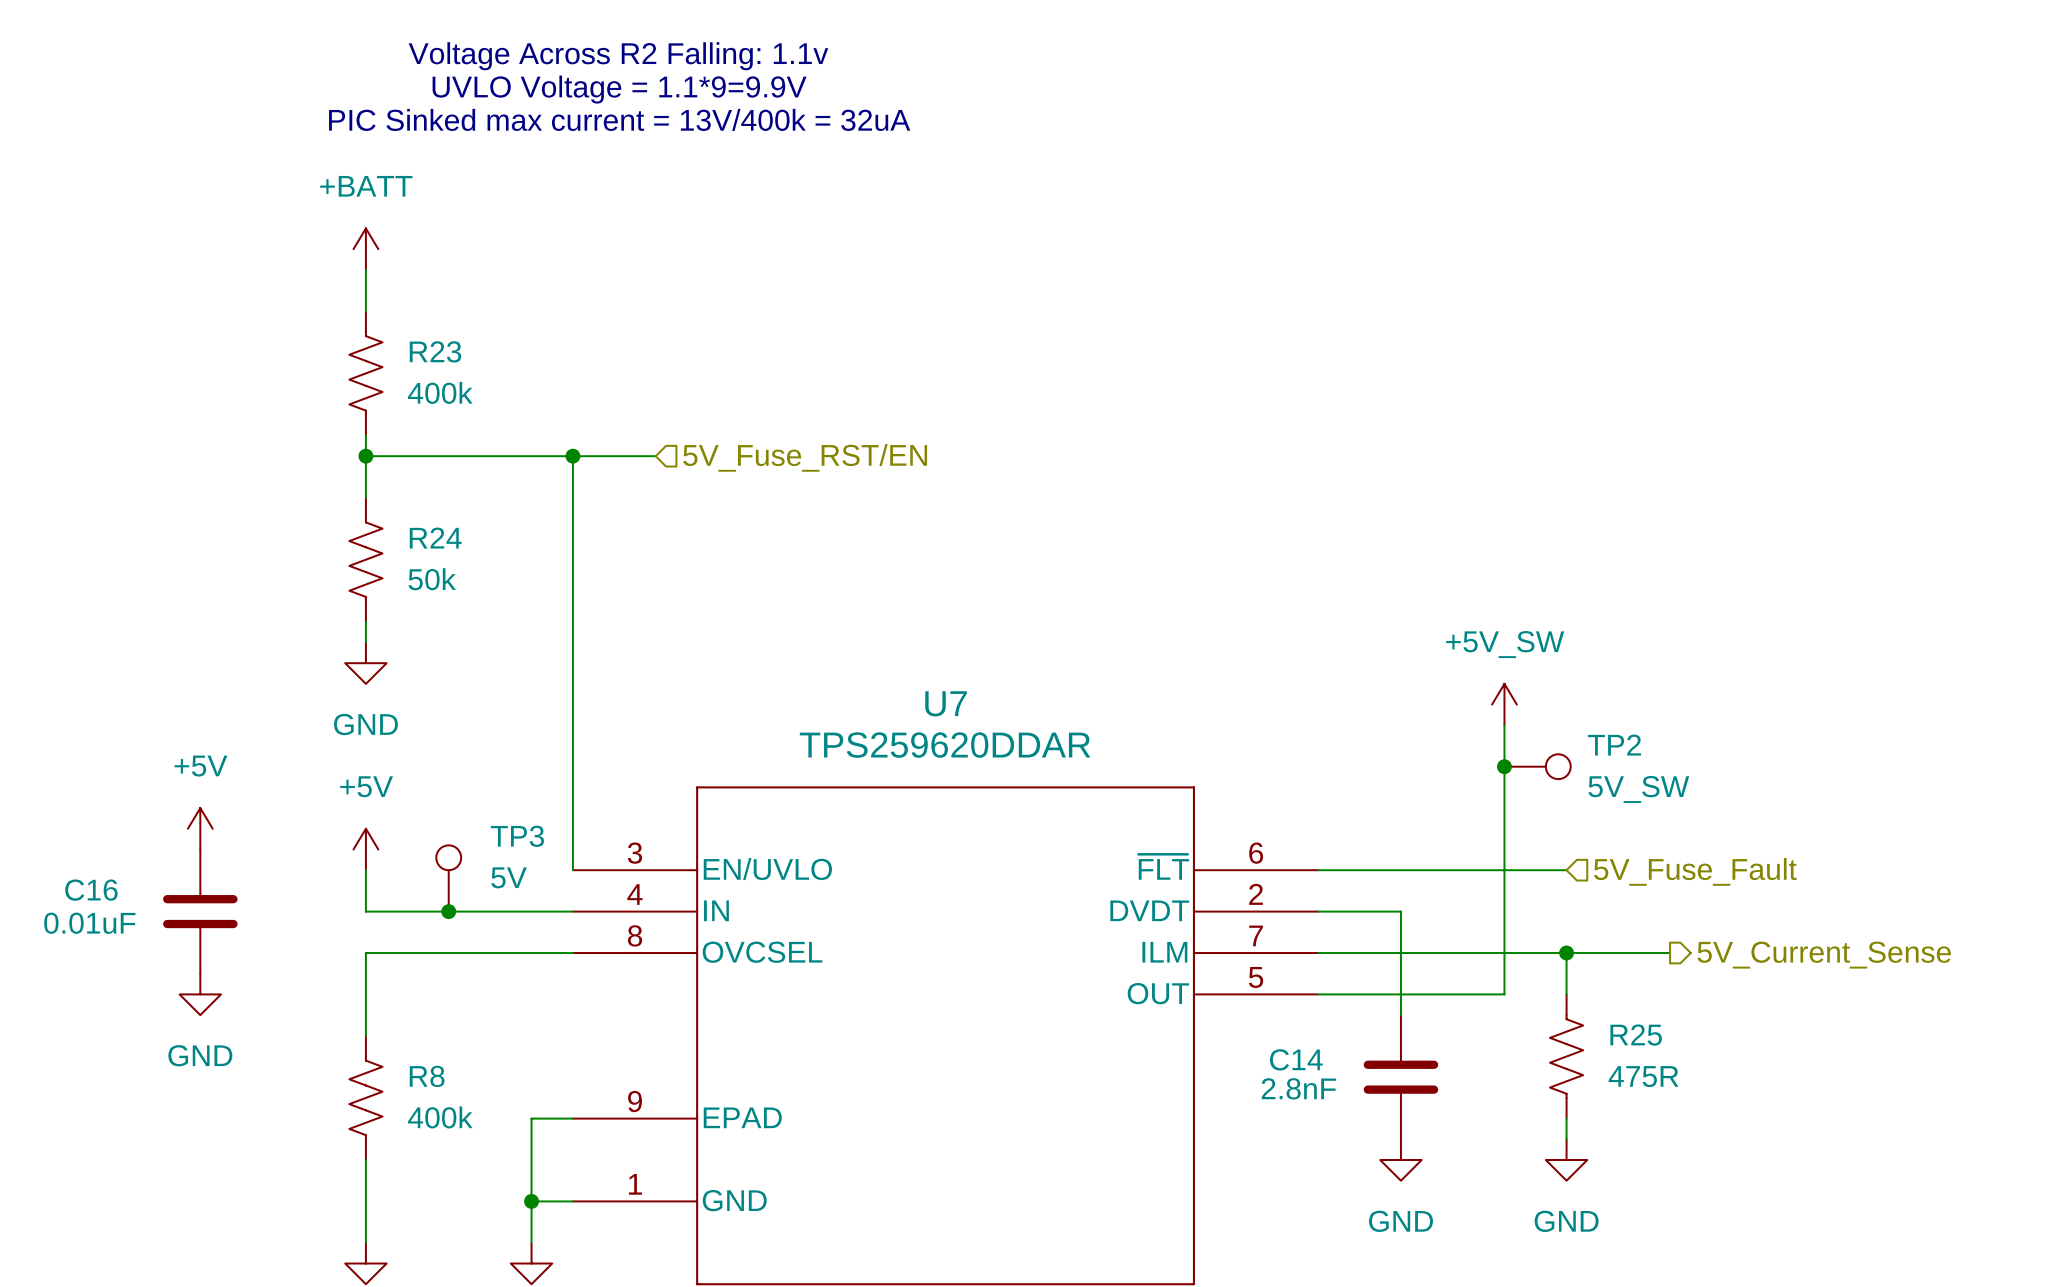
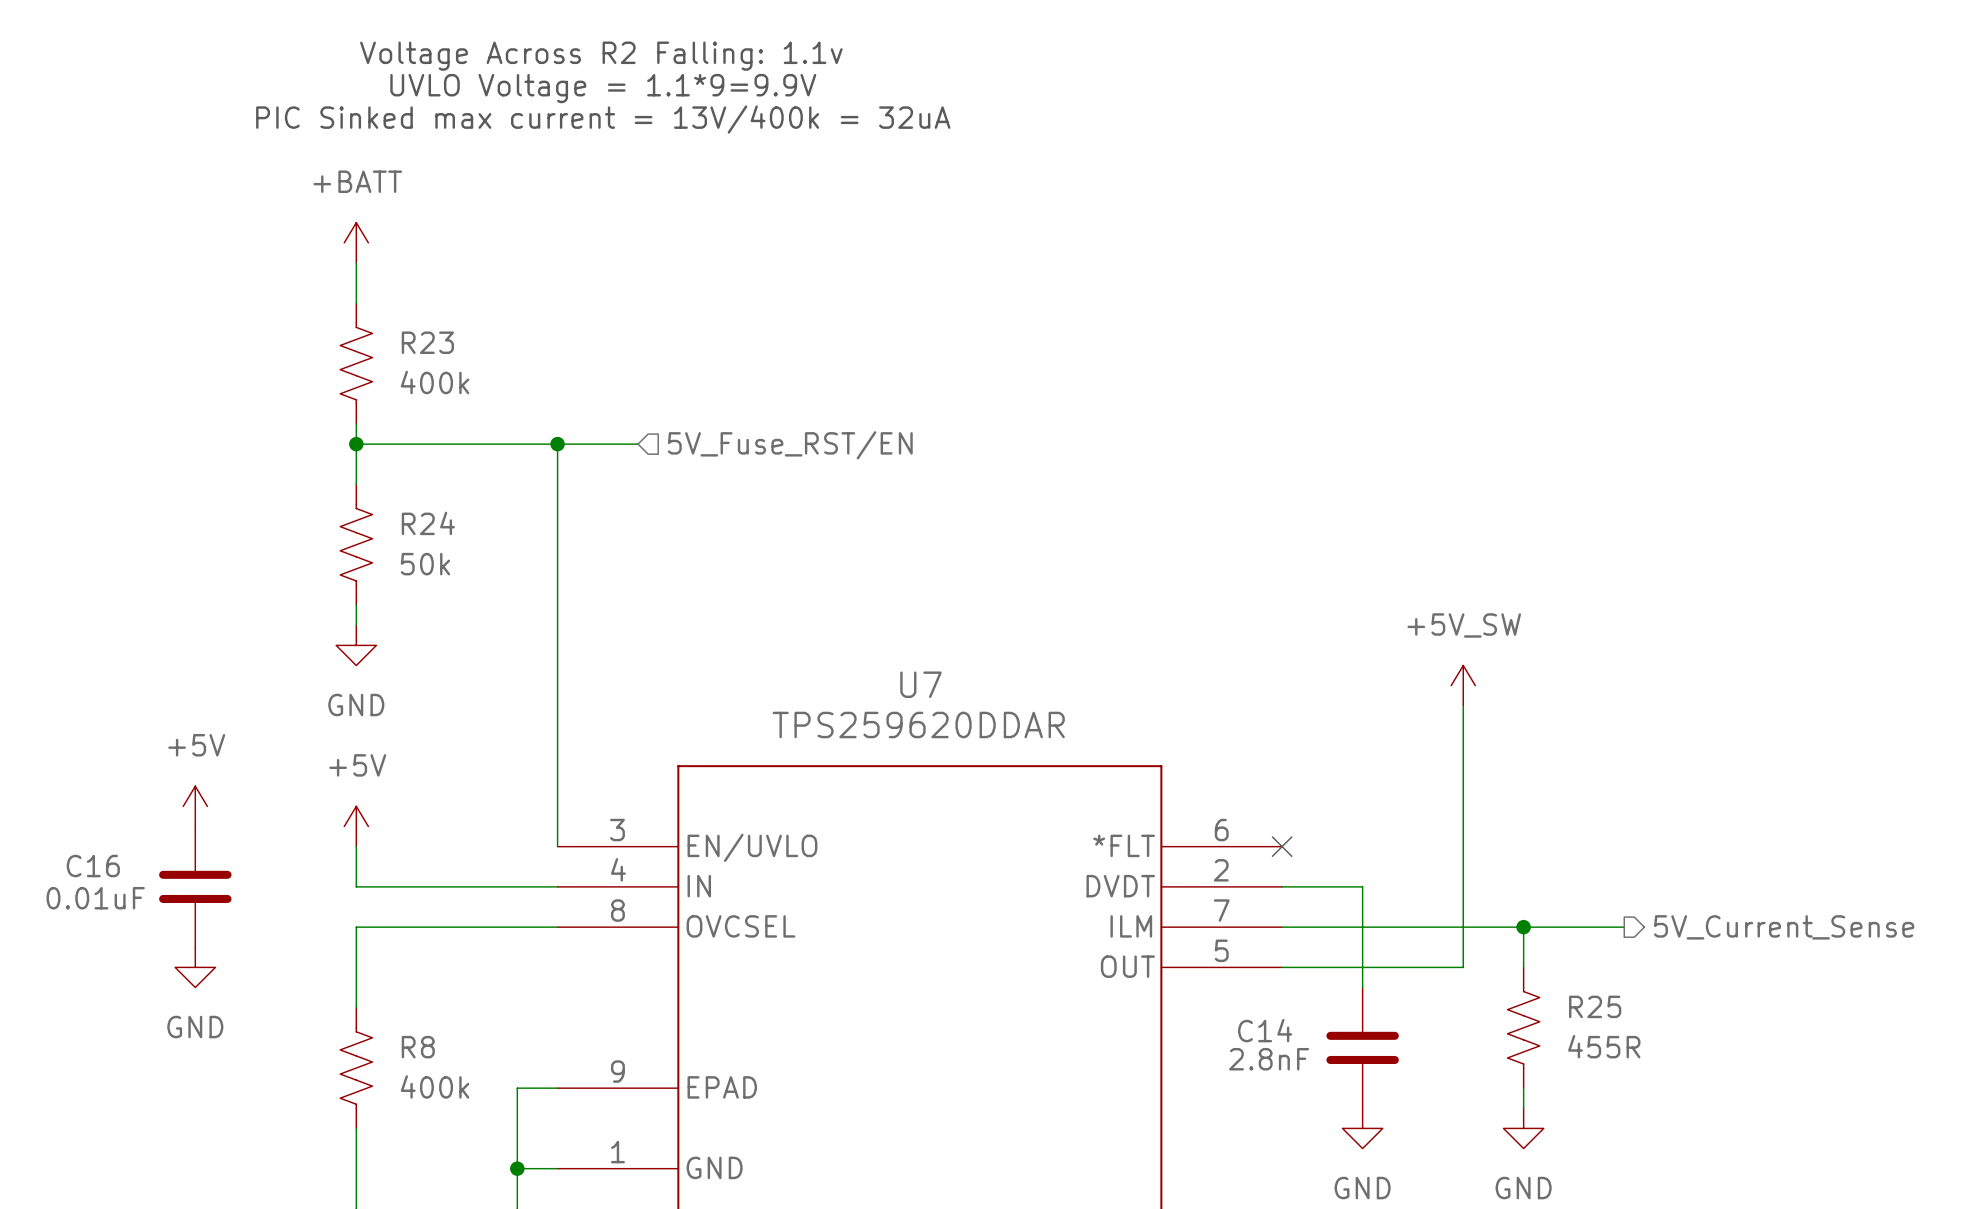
junction: (1504, 766) -> none
TP2: 5V_SW (1537, 766) -> none
U7 pin name: ~{FLT} (1163, 867) -> *FLT (1124, 845)
wire: (1318, 870) (1566, 870) -> none
no-connect mark: none -> (1282, 846)
hierarchical label: 5V_Fuse_Fault (1695, 871) -> none
TP3: 5V (448, 878) -> none
junction: (448, 911) -> none
R25 value: 475R (1643, 1076) -> 455R (1604, 1046)

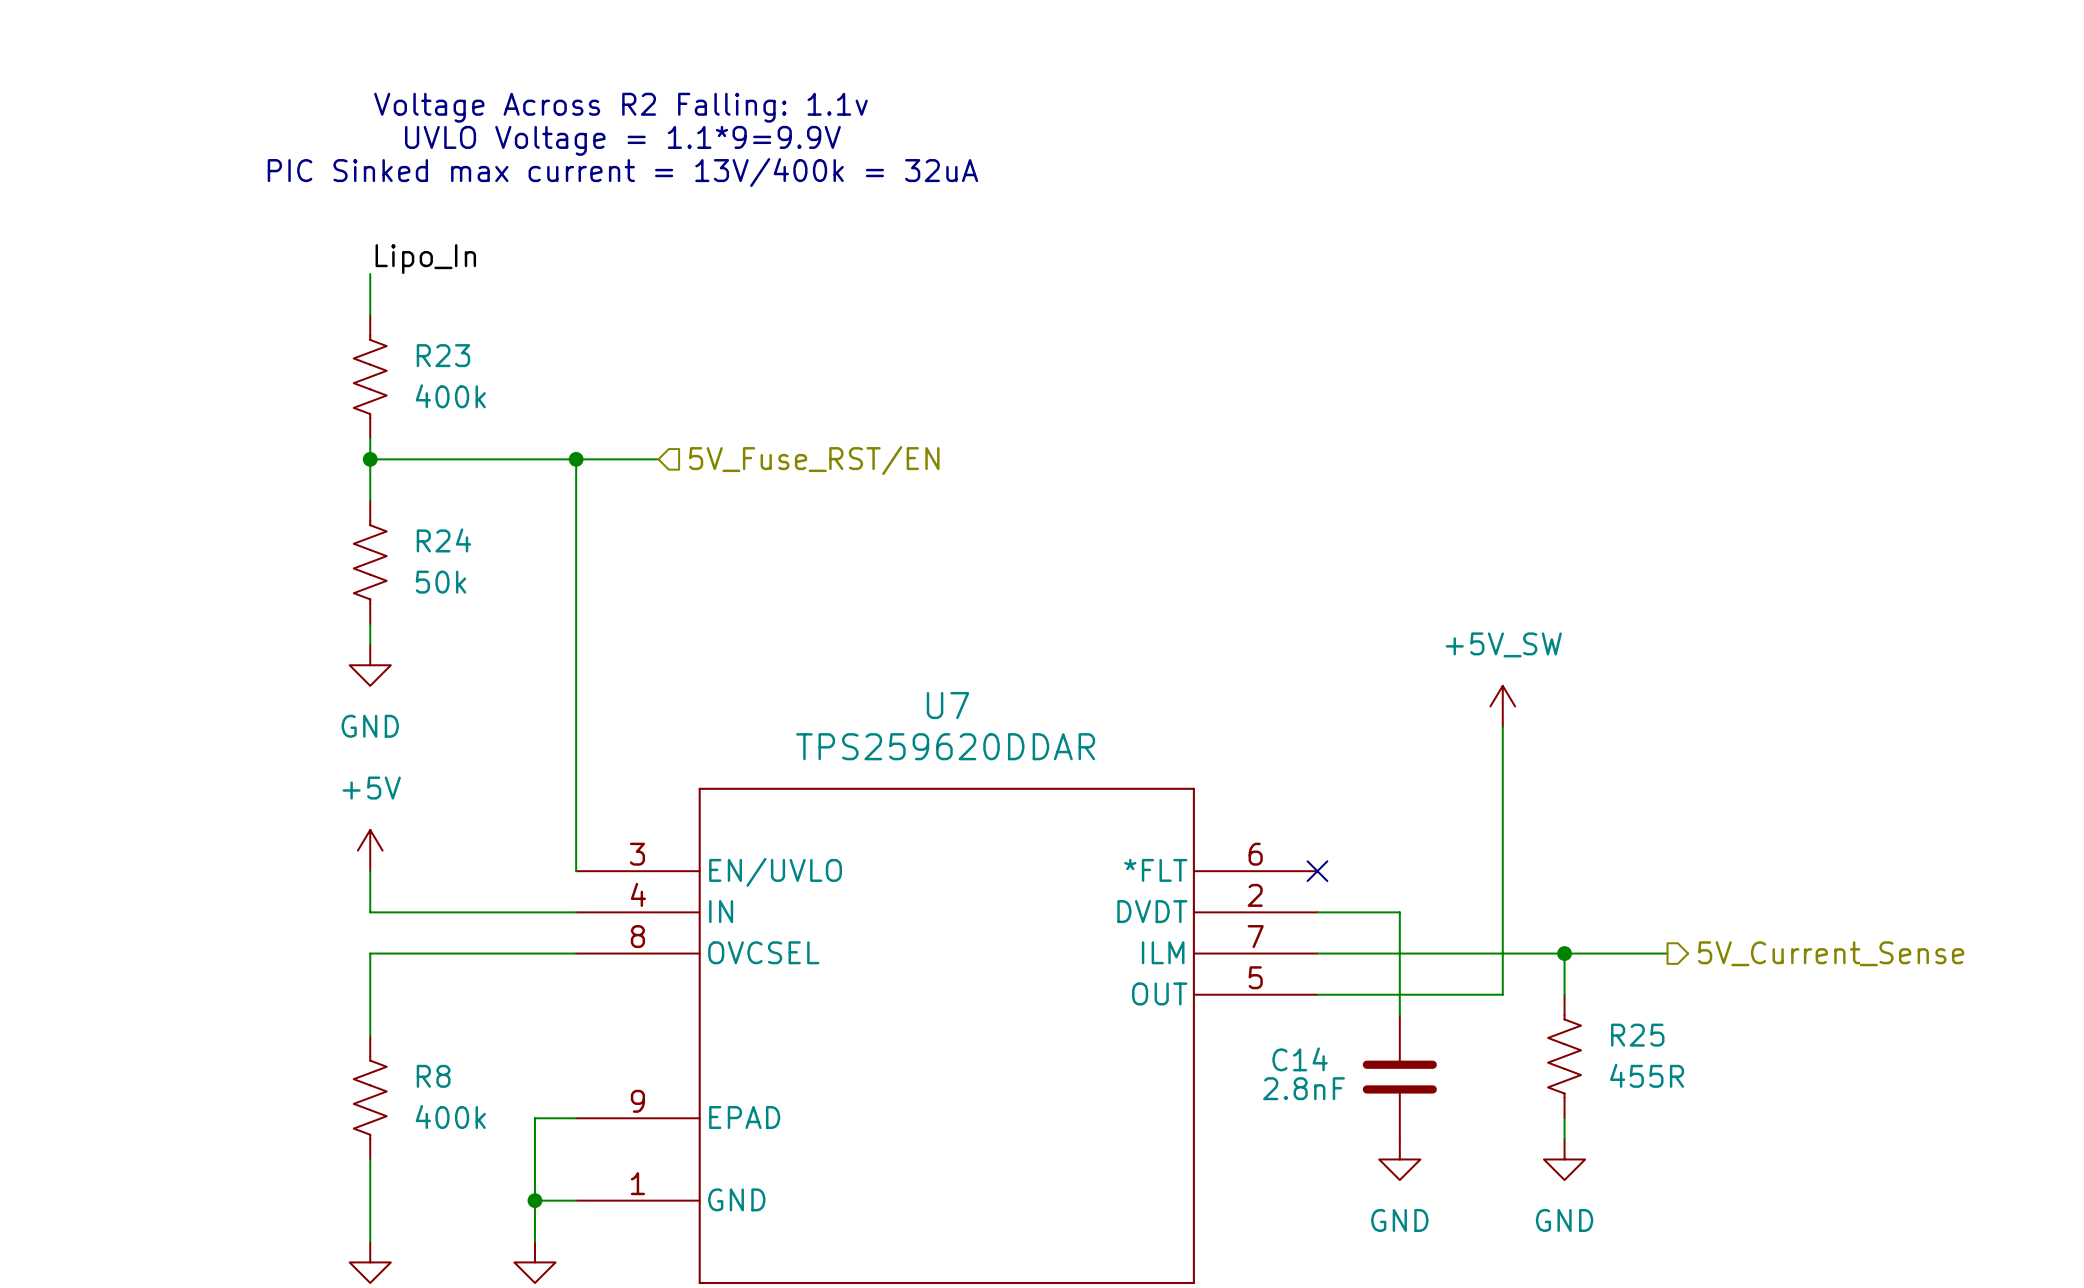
text position: Voltage Across R2 Falling: 1.1v (601, 56) -> Voltage Across R2 Falling: 1.1v (620, 107)
text position: UVLO Voltage = 1.1*9=9.9V (603, 88) -> UVLO Voltage = 1.1*9=9.9V (622, 140)
text position: PIC Sinked max current = 13V/400k = 32uA (603, 119) -> PIC Sinked max current = 13V/400k = 32uA (622, 172)
power symbol: +BATT (356, 242) -> none
label: none -> Lipo_In (425, 259)
power symbol: +5V (195, 806) -> none
C16: 0.01uF (195, 886) -> none
power symbol: GND (195, 967) -> none

